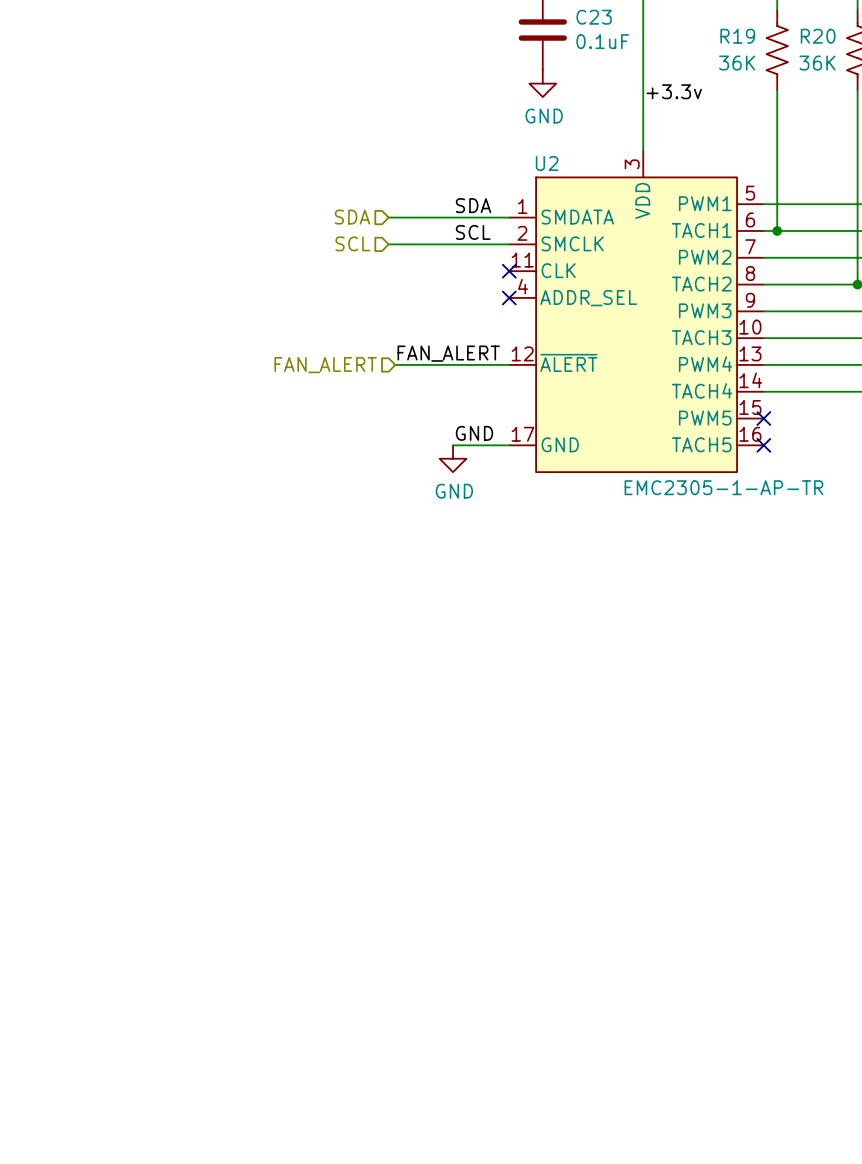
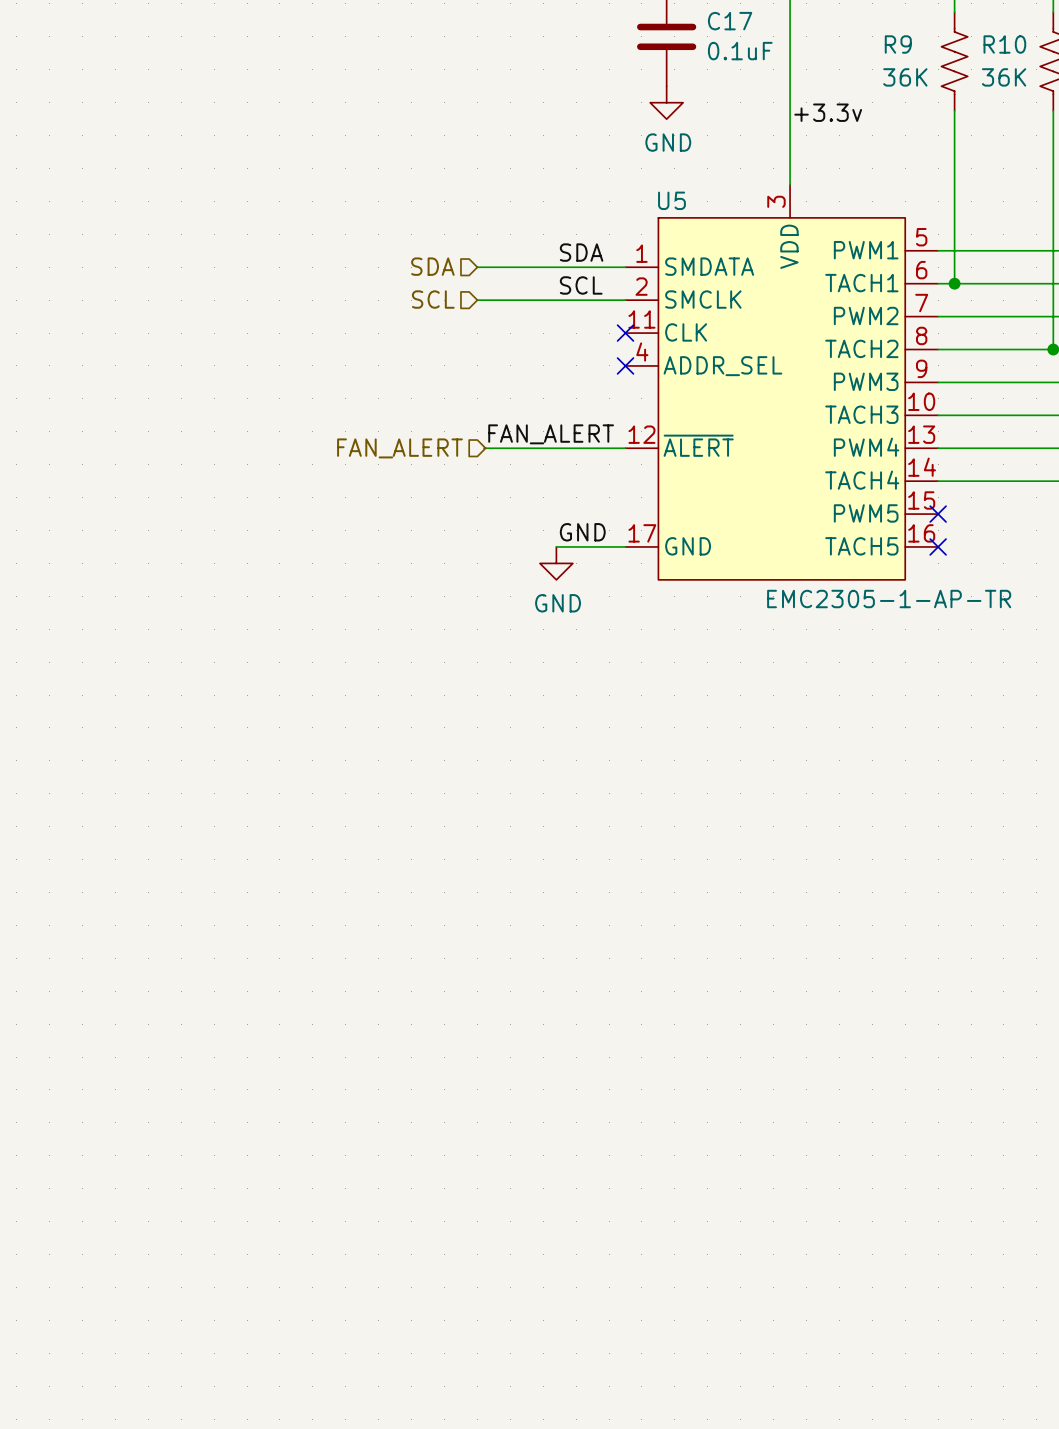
C23 name: C23 (594, 17) -> C17 (730, 21)
R19 name: R19 (737, 36) -> R9 (898, 44)
R20 name: R20 (818, 36) -> R10 (1004, 44)
U2 name: U2 (547, 163) -> U5 (671, 200)

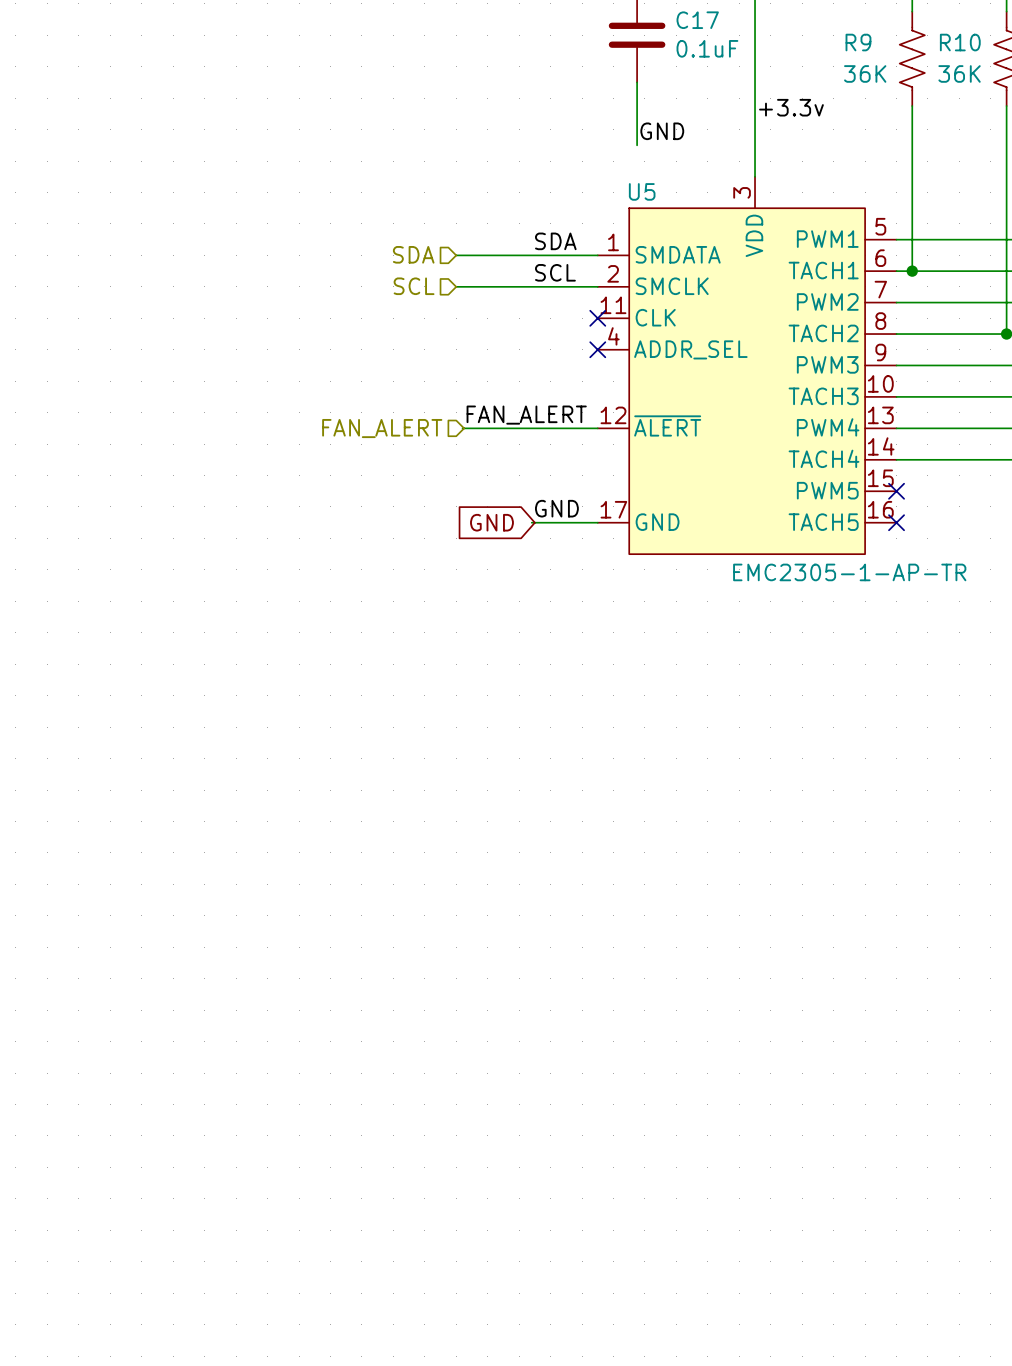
wire: none -> (637, 82) (637, 145)
power symbol: GND (666, 102) -> none
label: none -> GND (662, 131)
global label: none -> GND (491, 522)
power symbol: GND (556, 563) -> none

